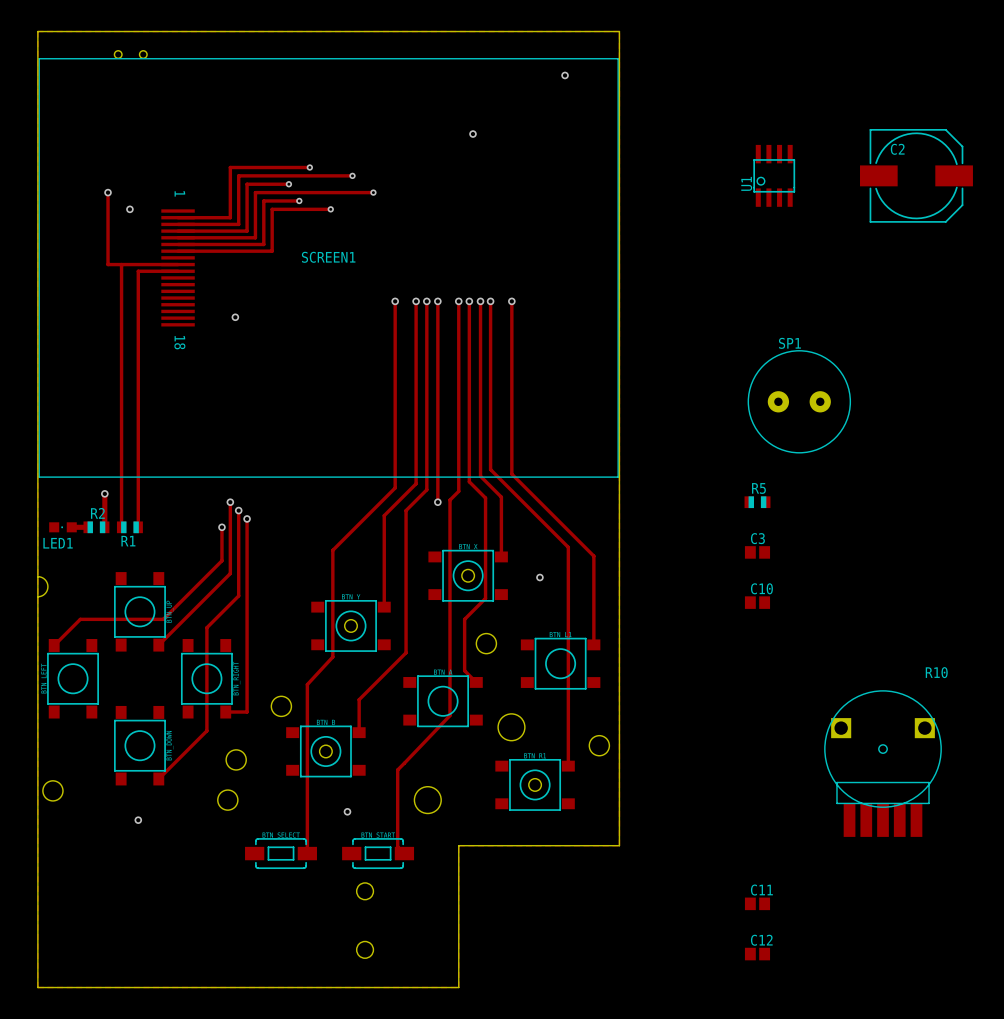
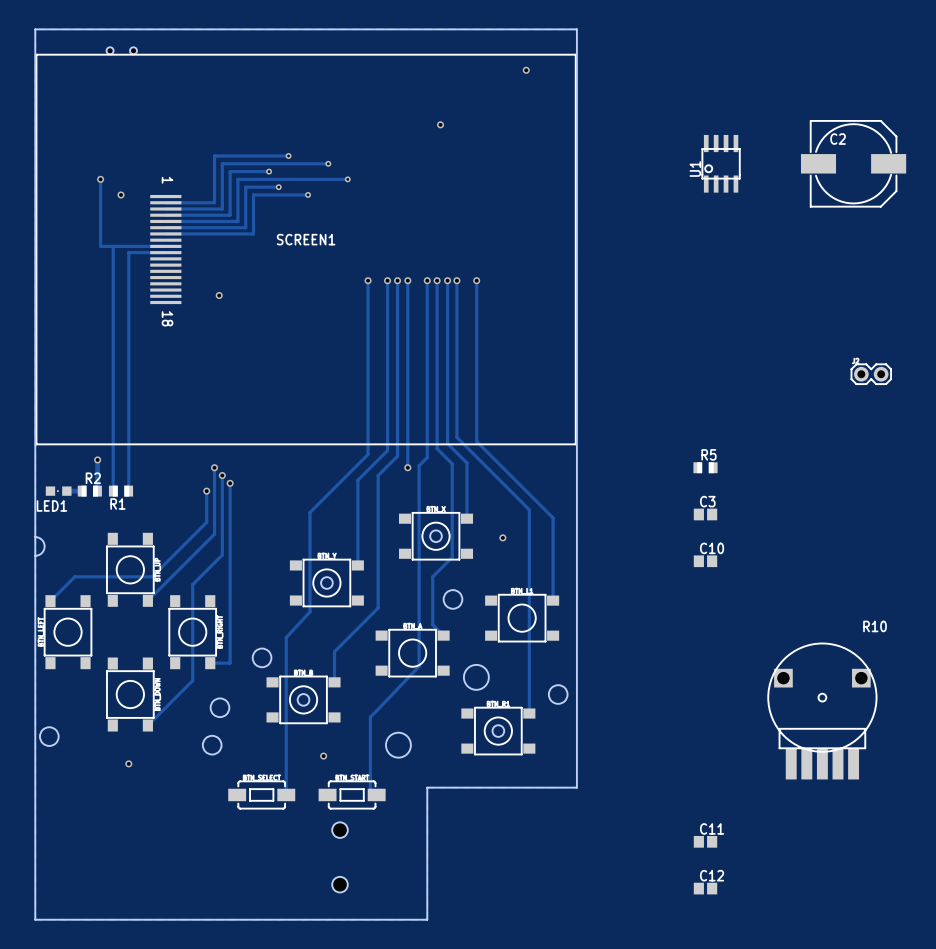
SP1: (799, 401) -> none
part: none -> (871, 374)

